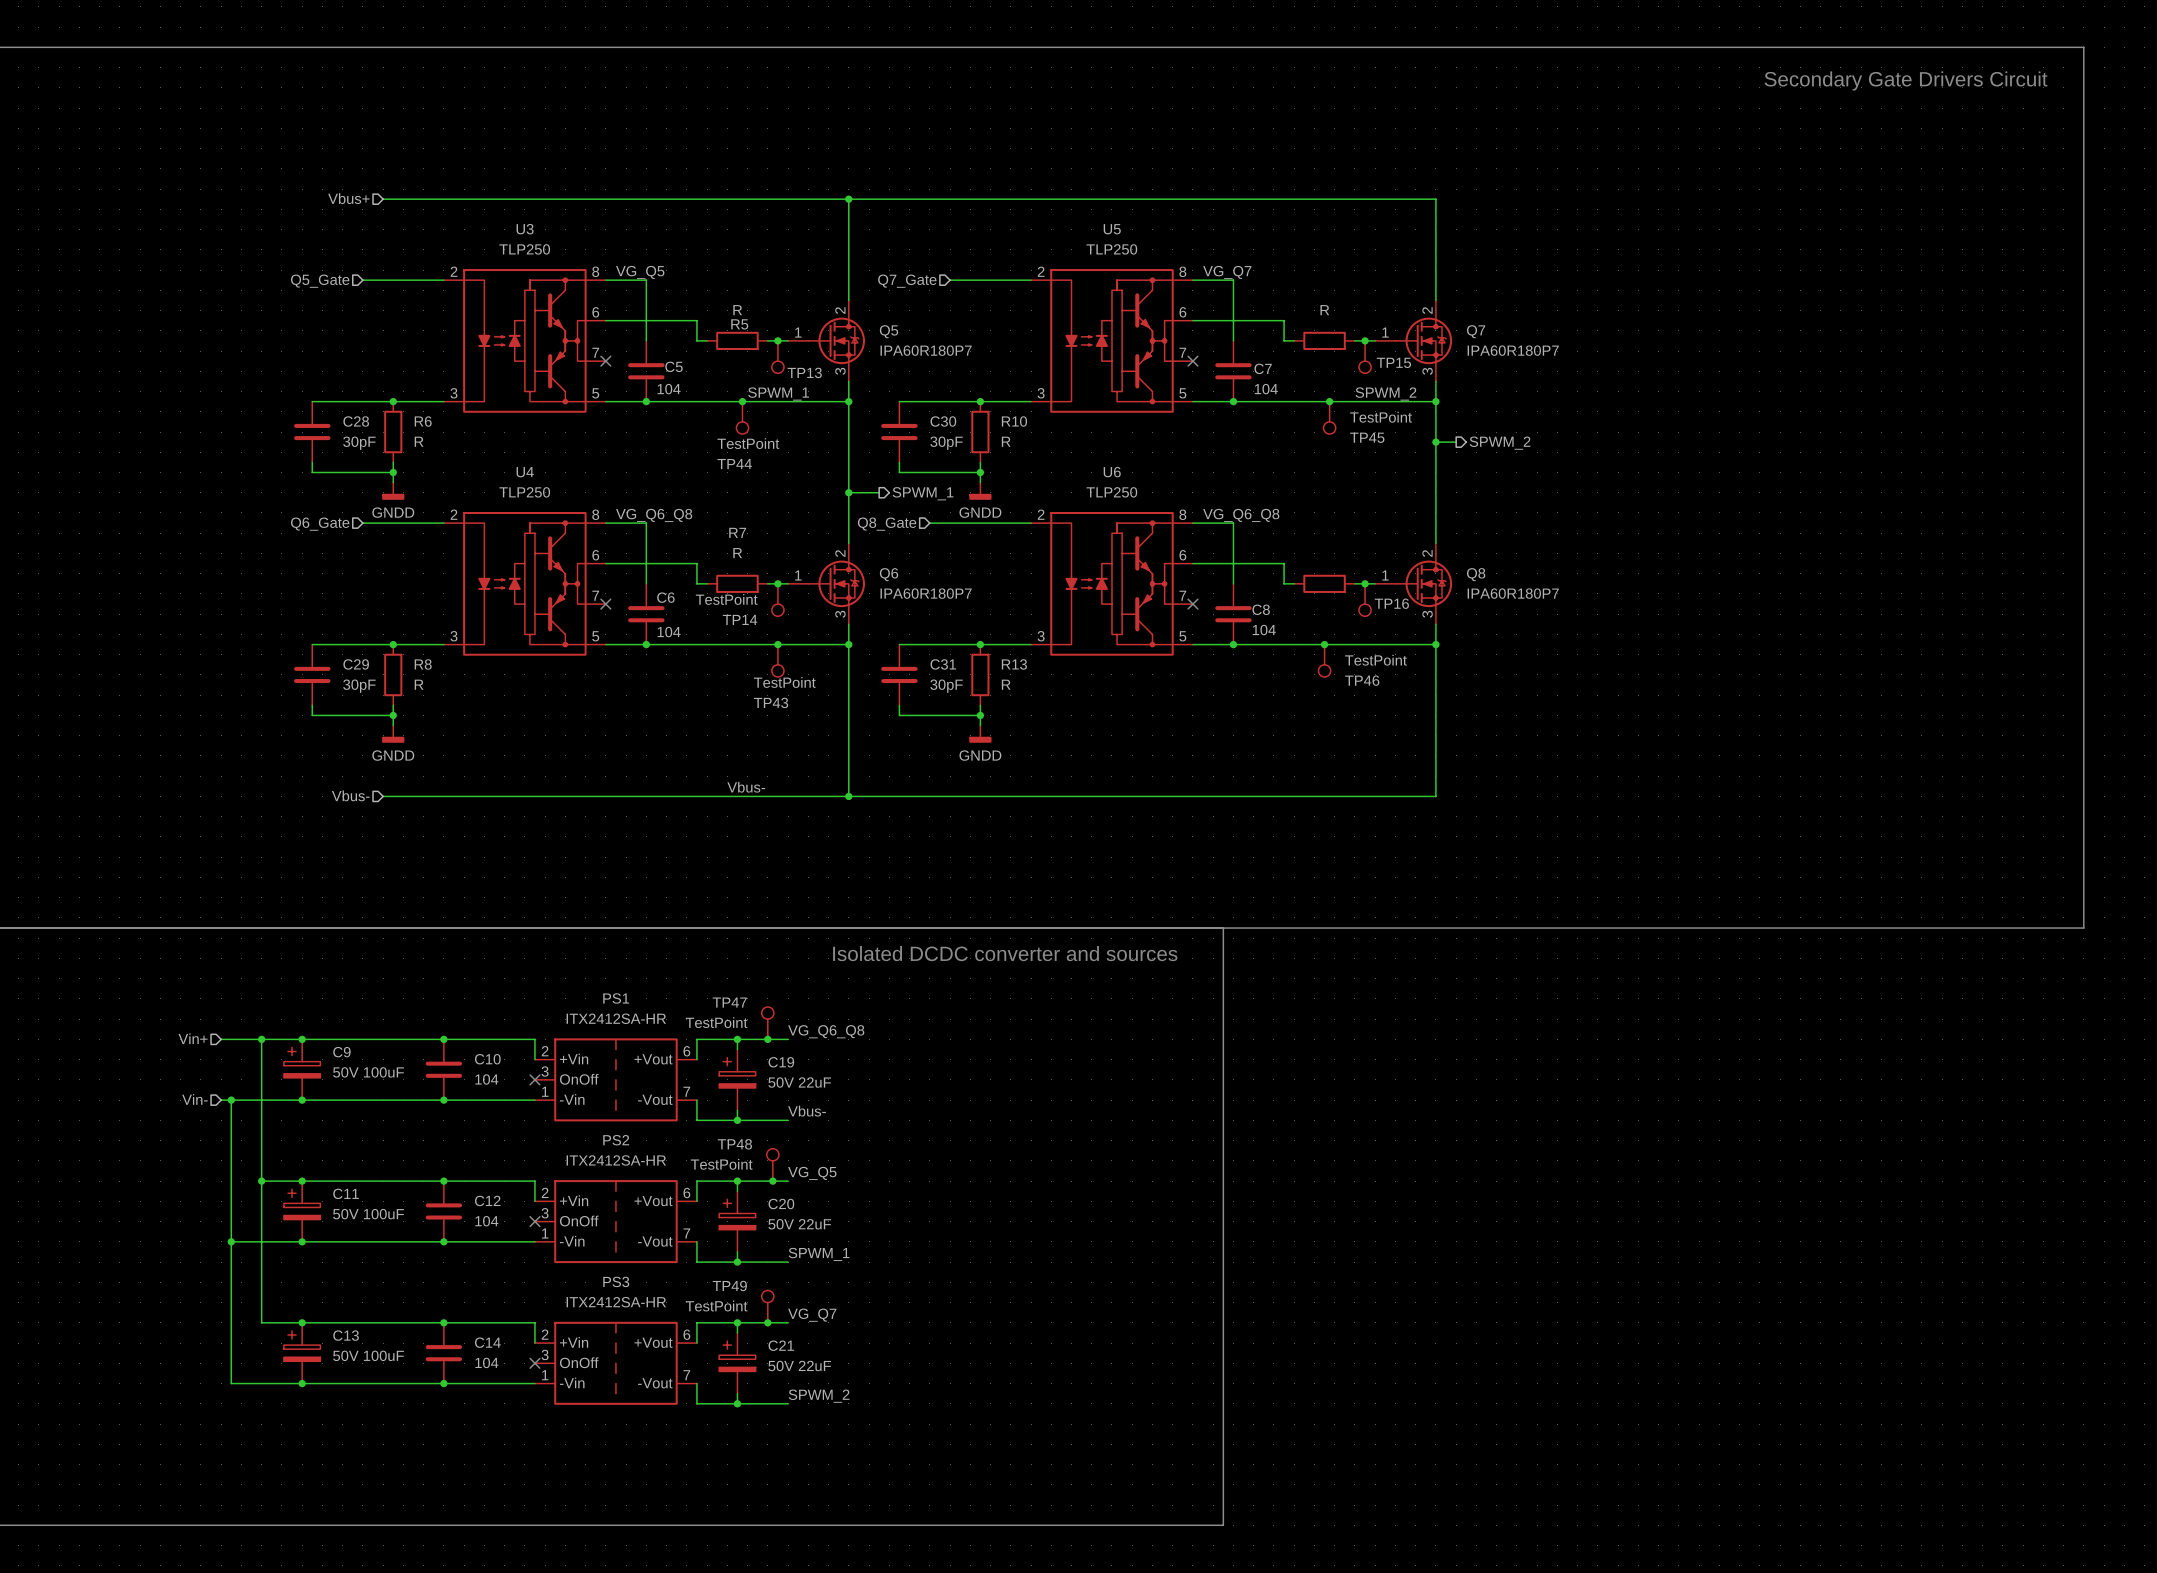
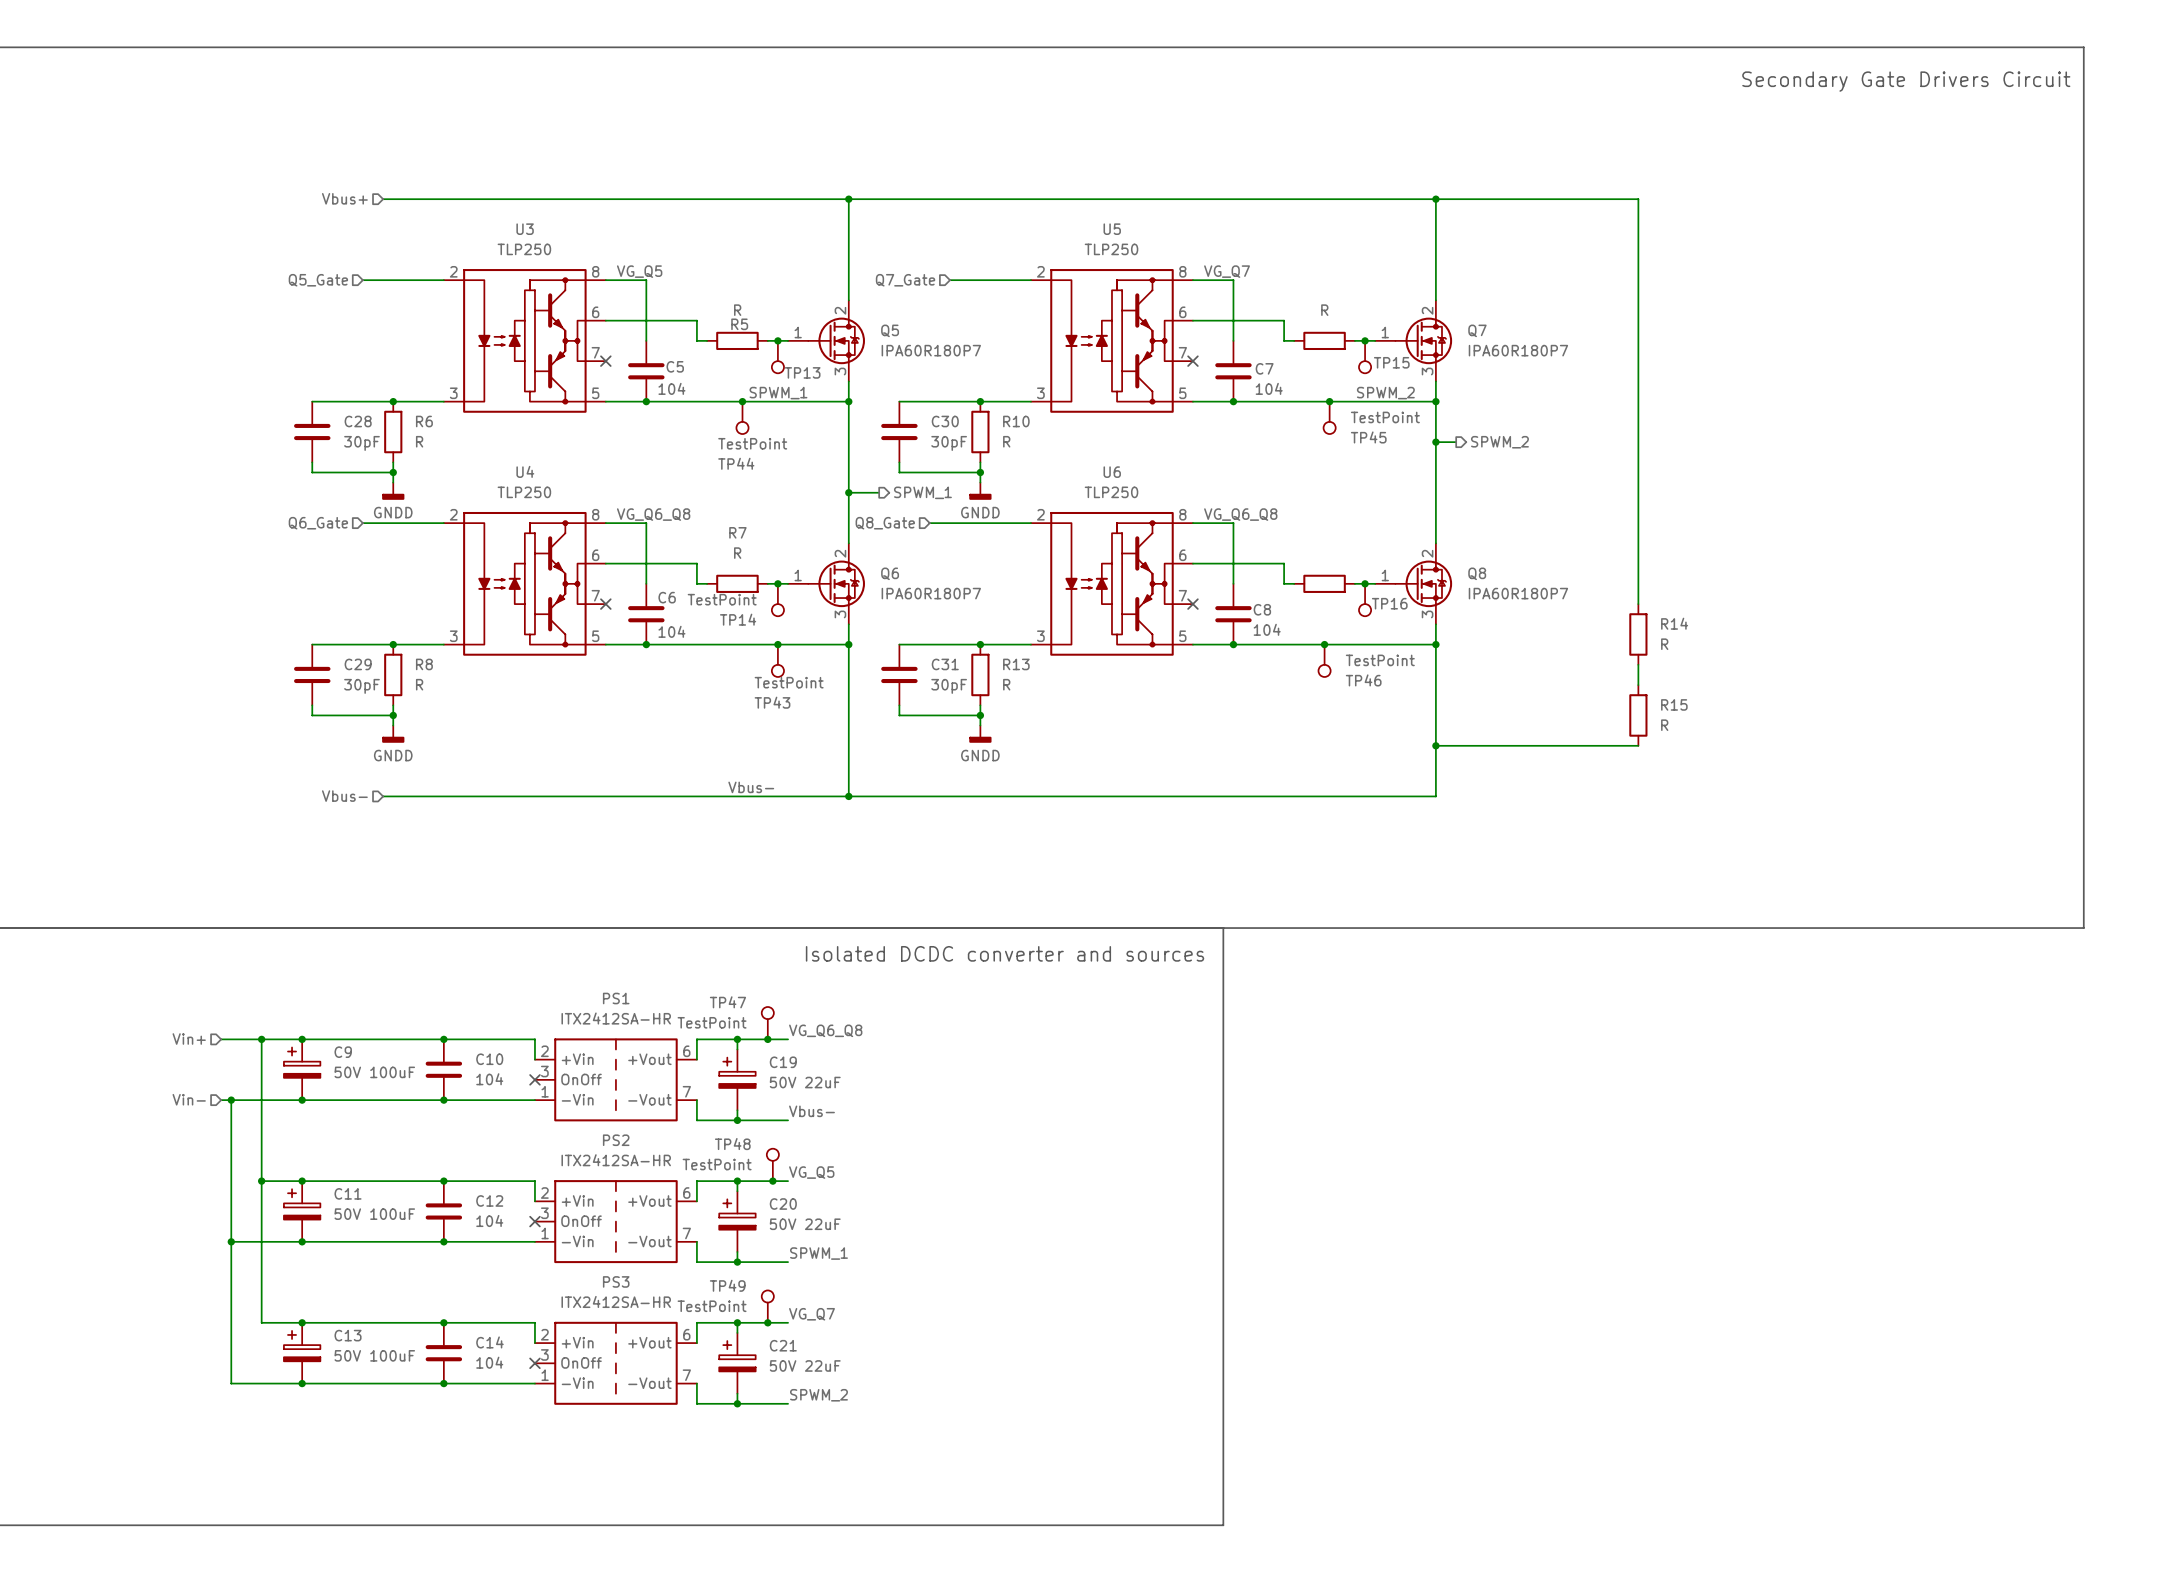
wire: none -> (1435, 199) (1638, 199) (1638, 604)
junction: none -> (1435, 199)
R14: none -> R (1638, 634)
wire: none -> (1638, 664) (1638, 685)
R15: none -> R (1638, 715)
wire: none -> (1435, 745) (1638, 745)
junction: none -> (1435, 745)

